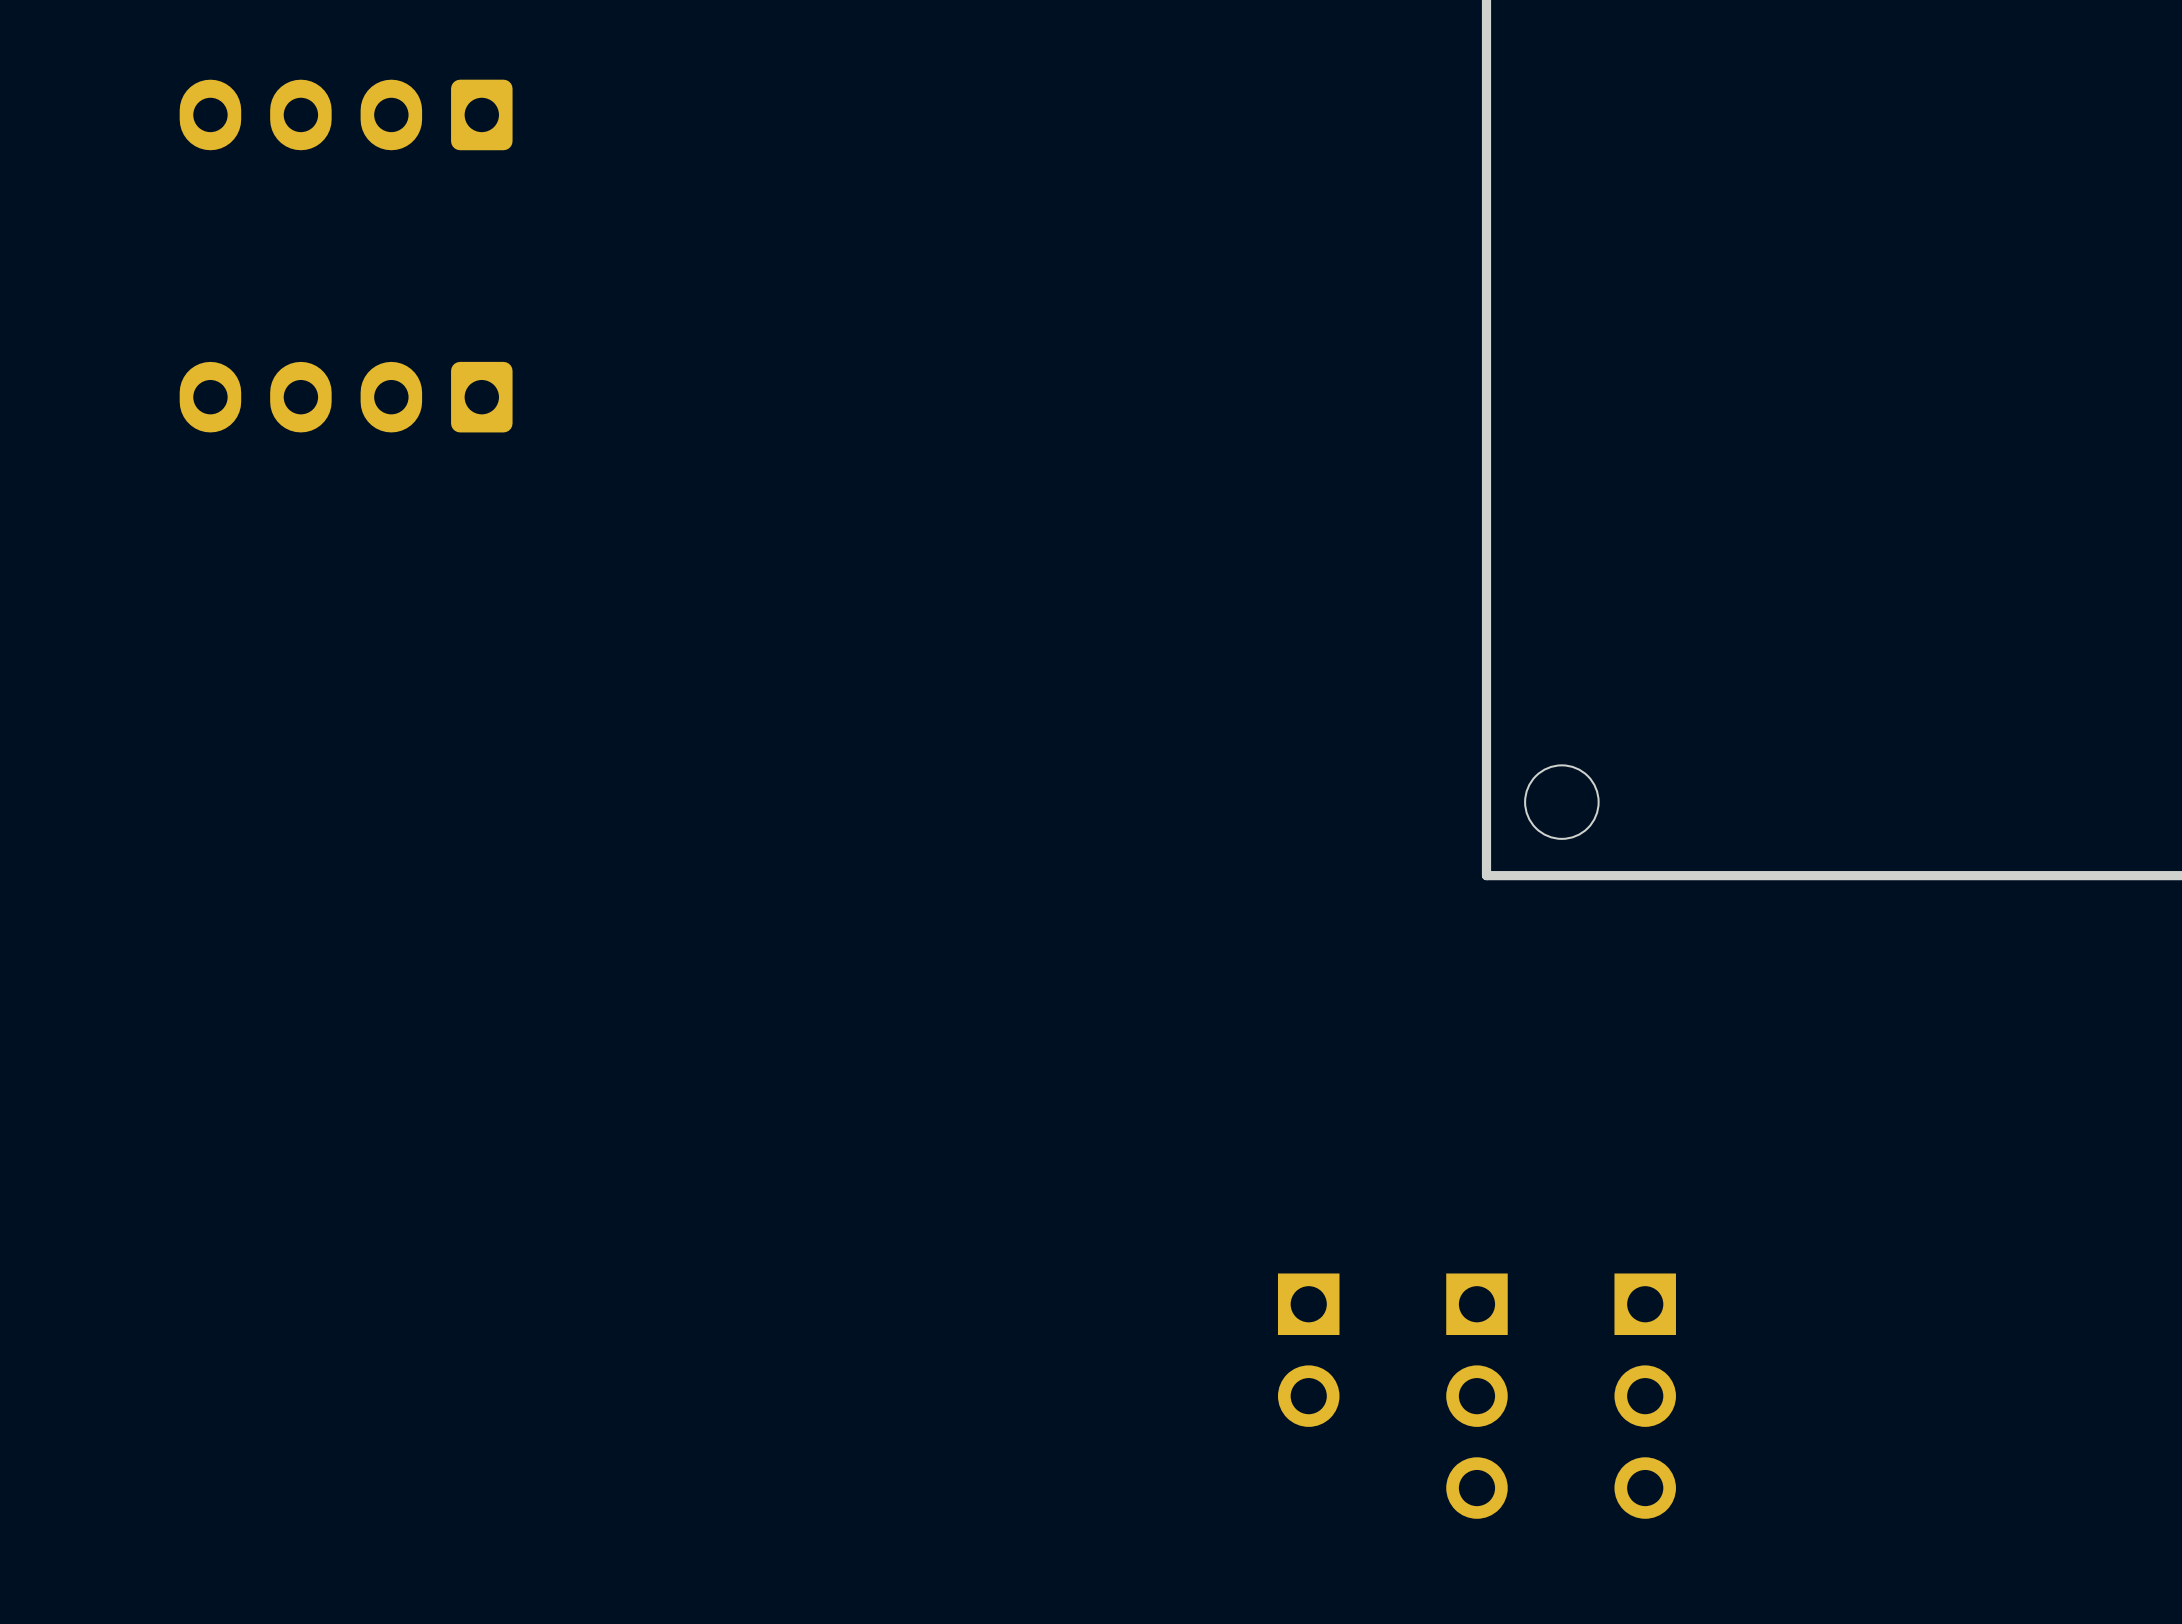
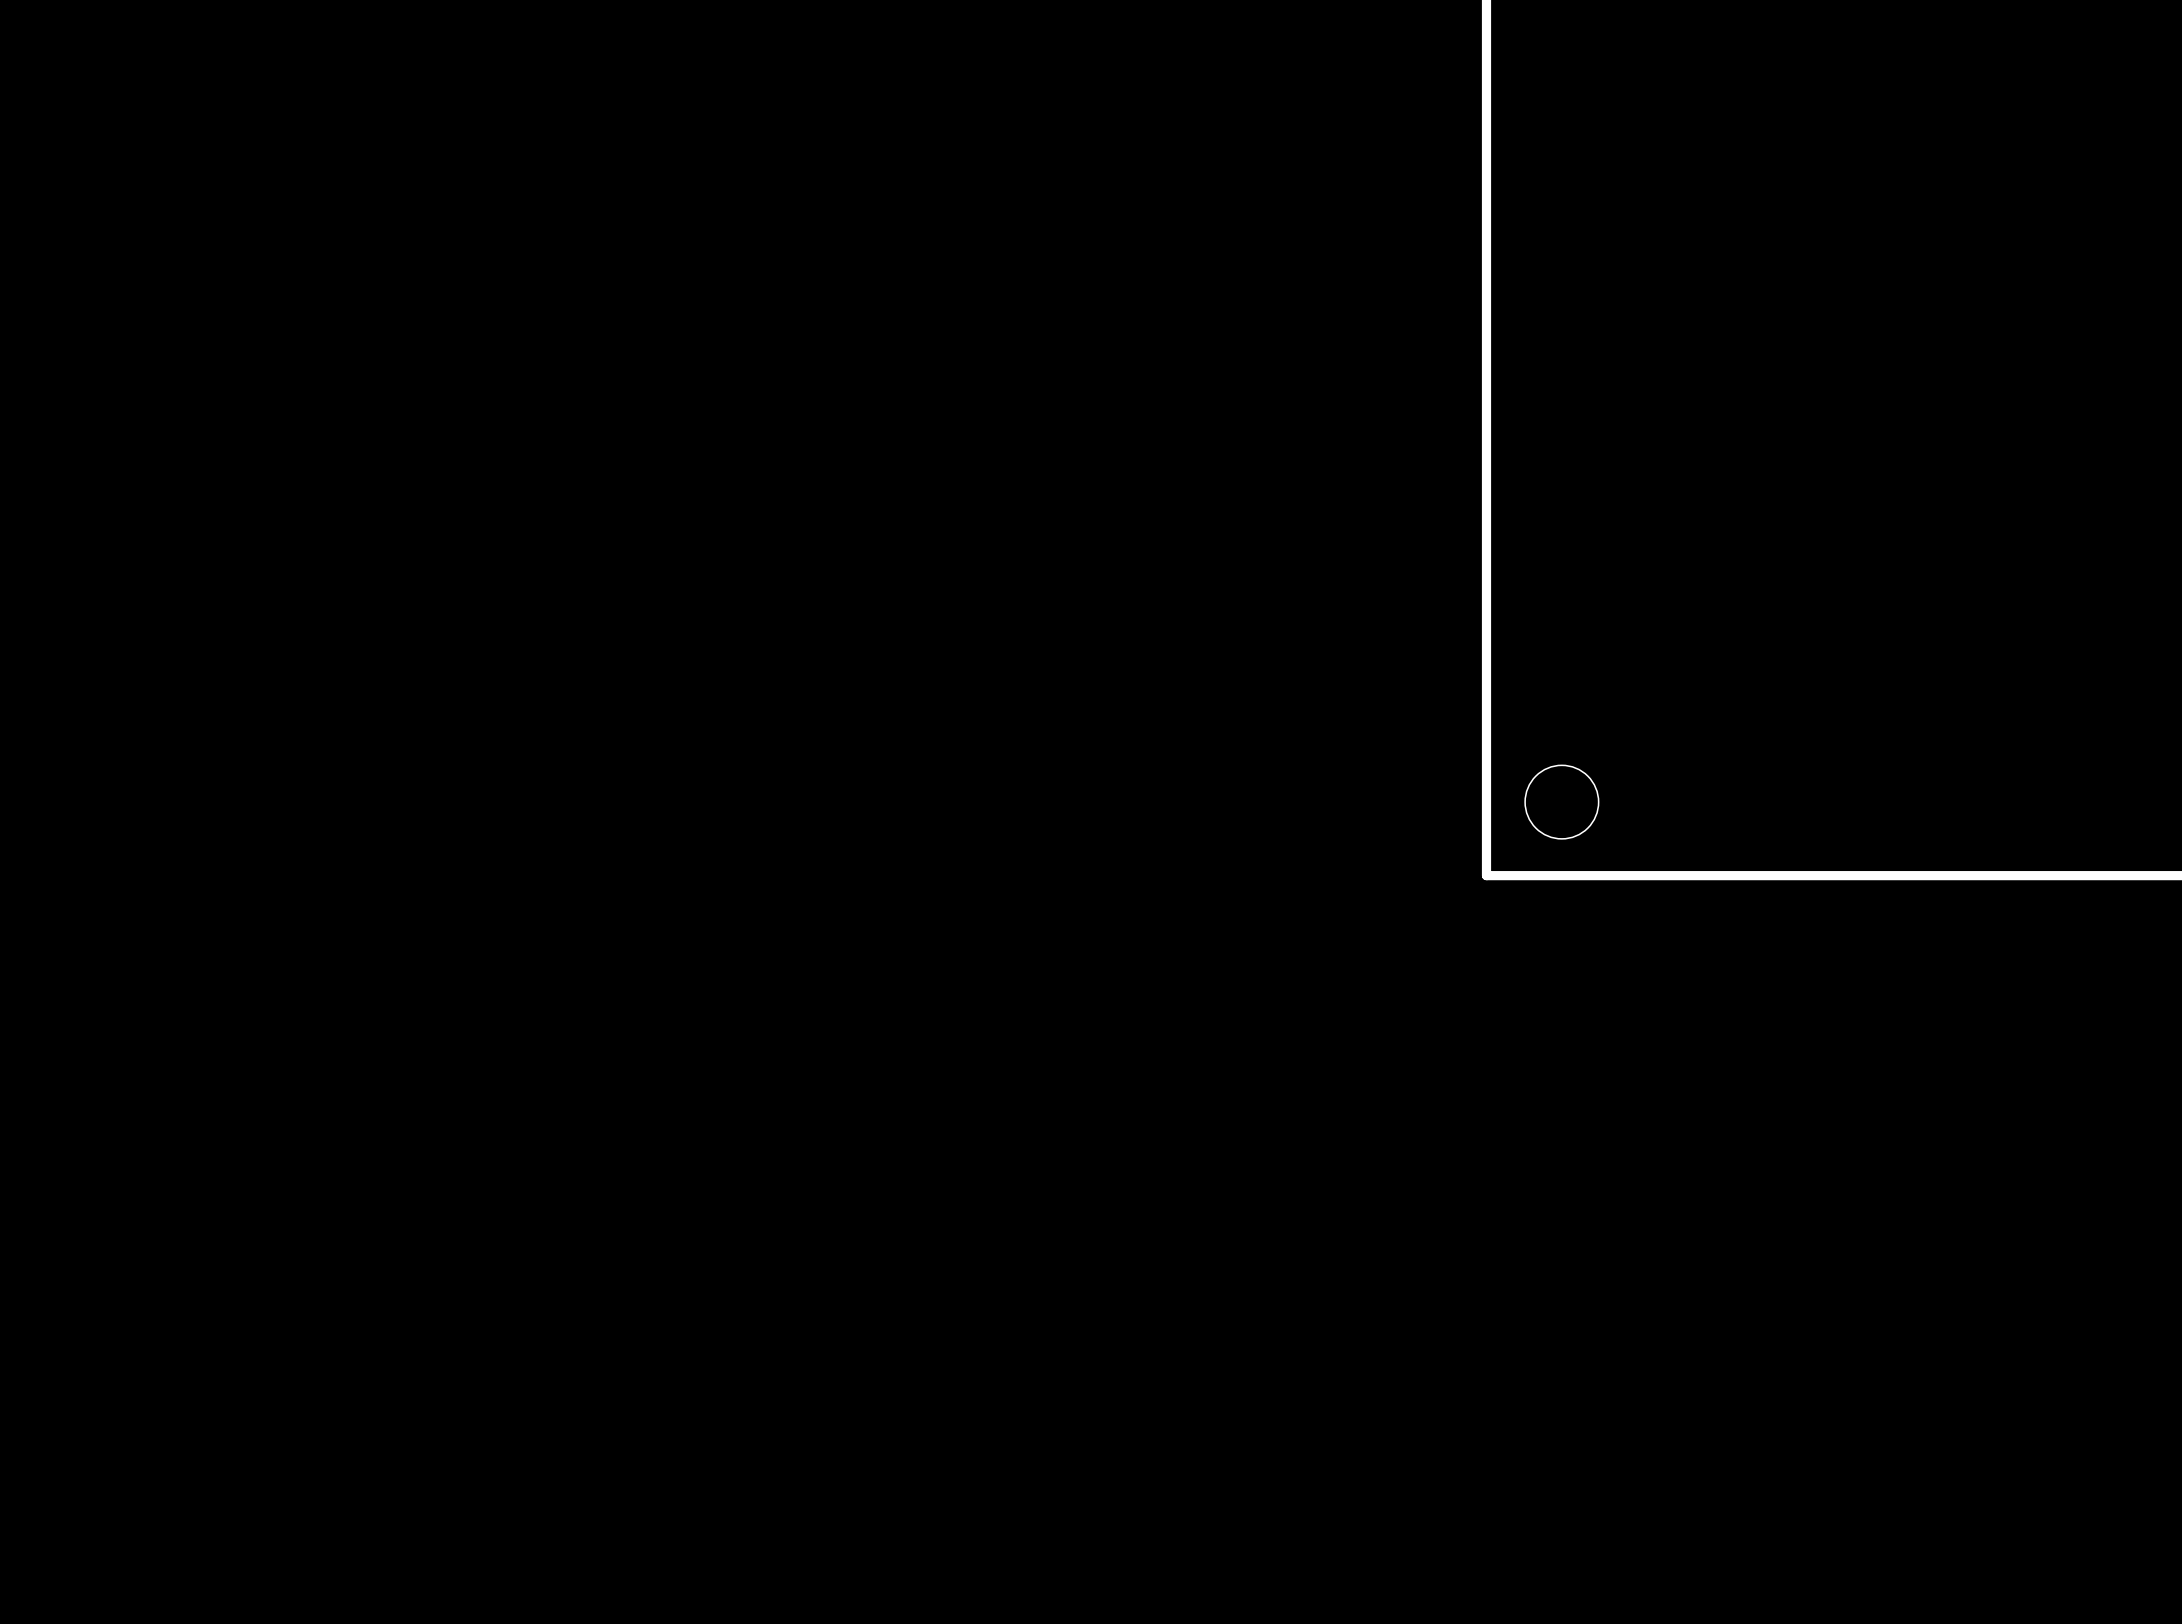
part: (346, 114) -> none
part: (346, 397) -> none
part: (1308, 1350) -> none
part: (1476, 1396) -> none
part: (1645, 1396) -> none

